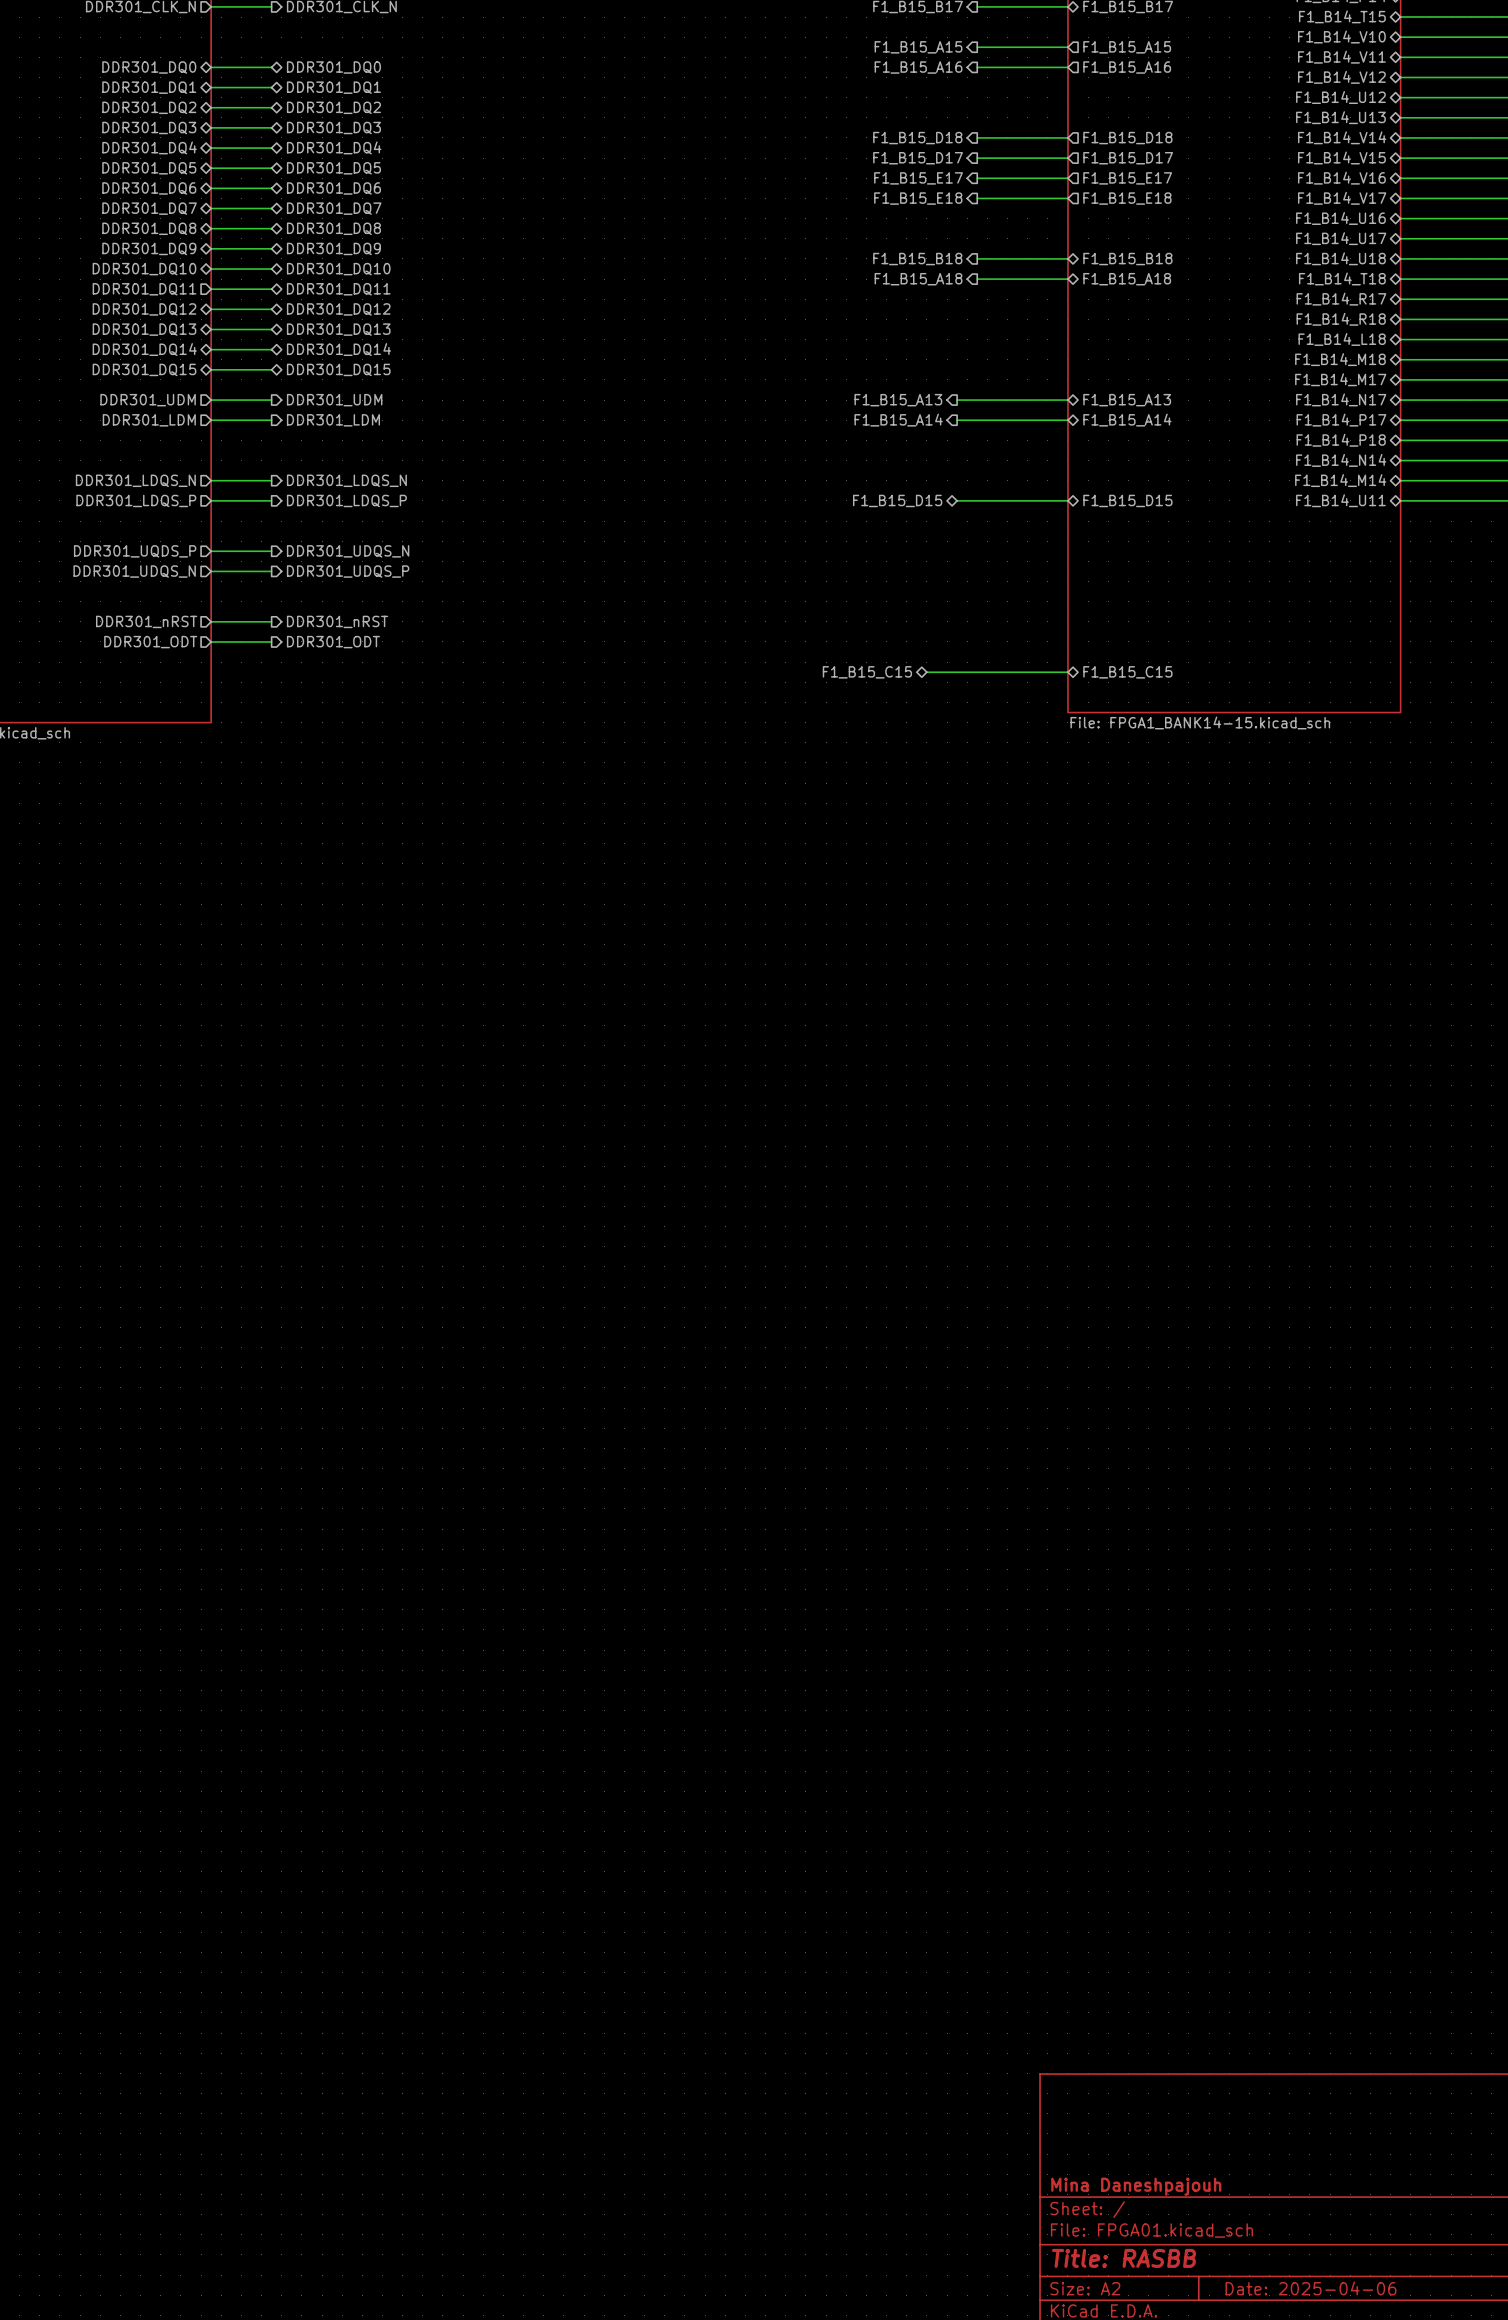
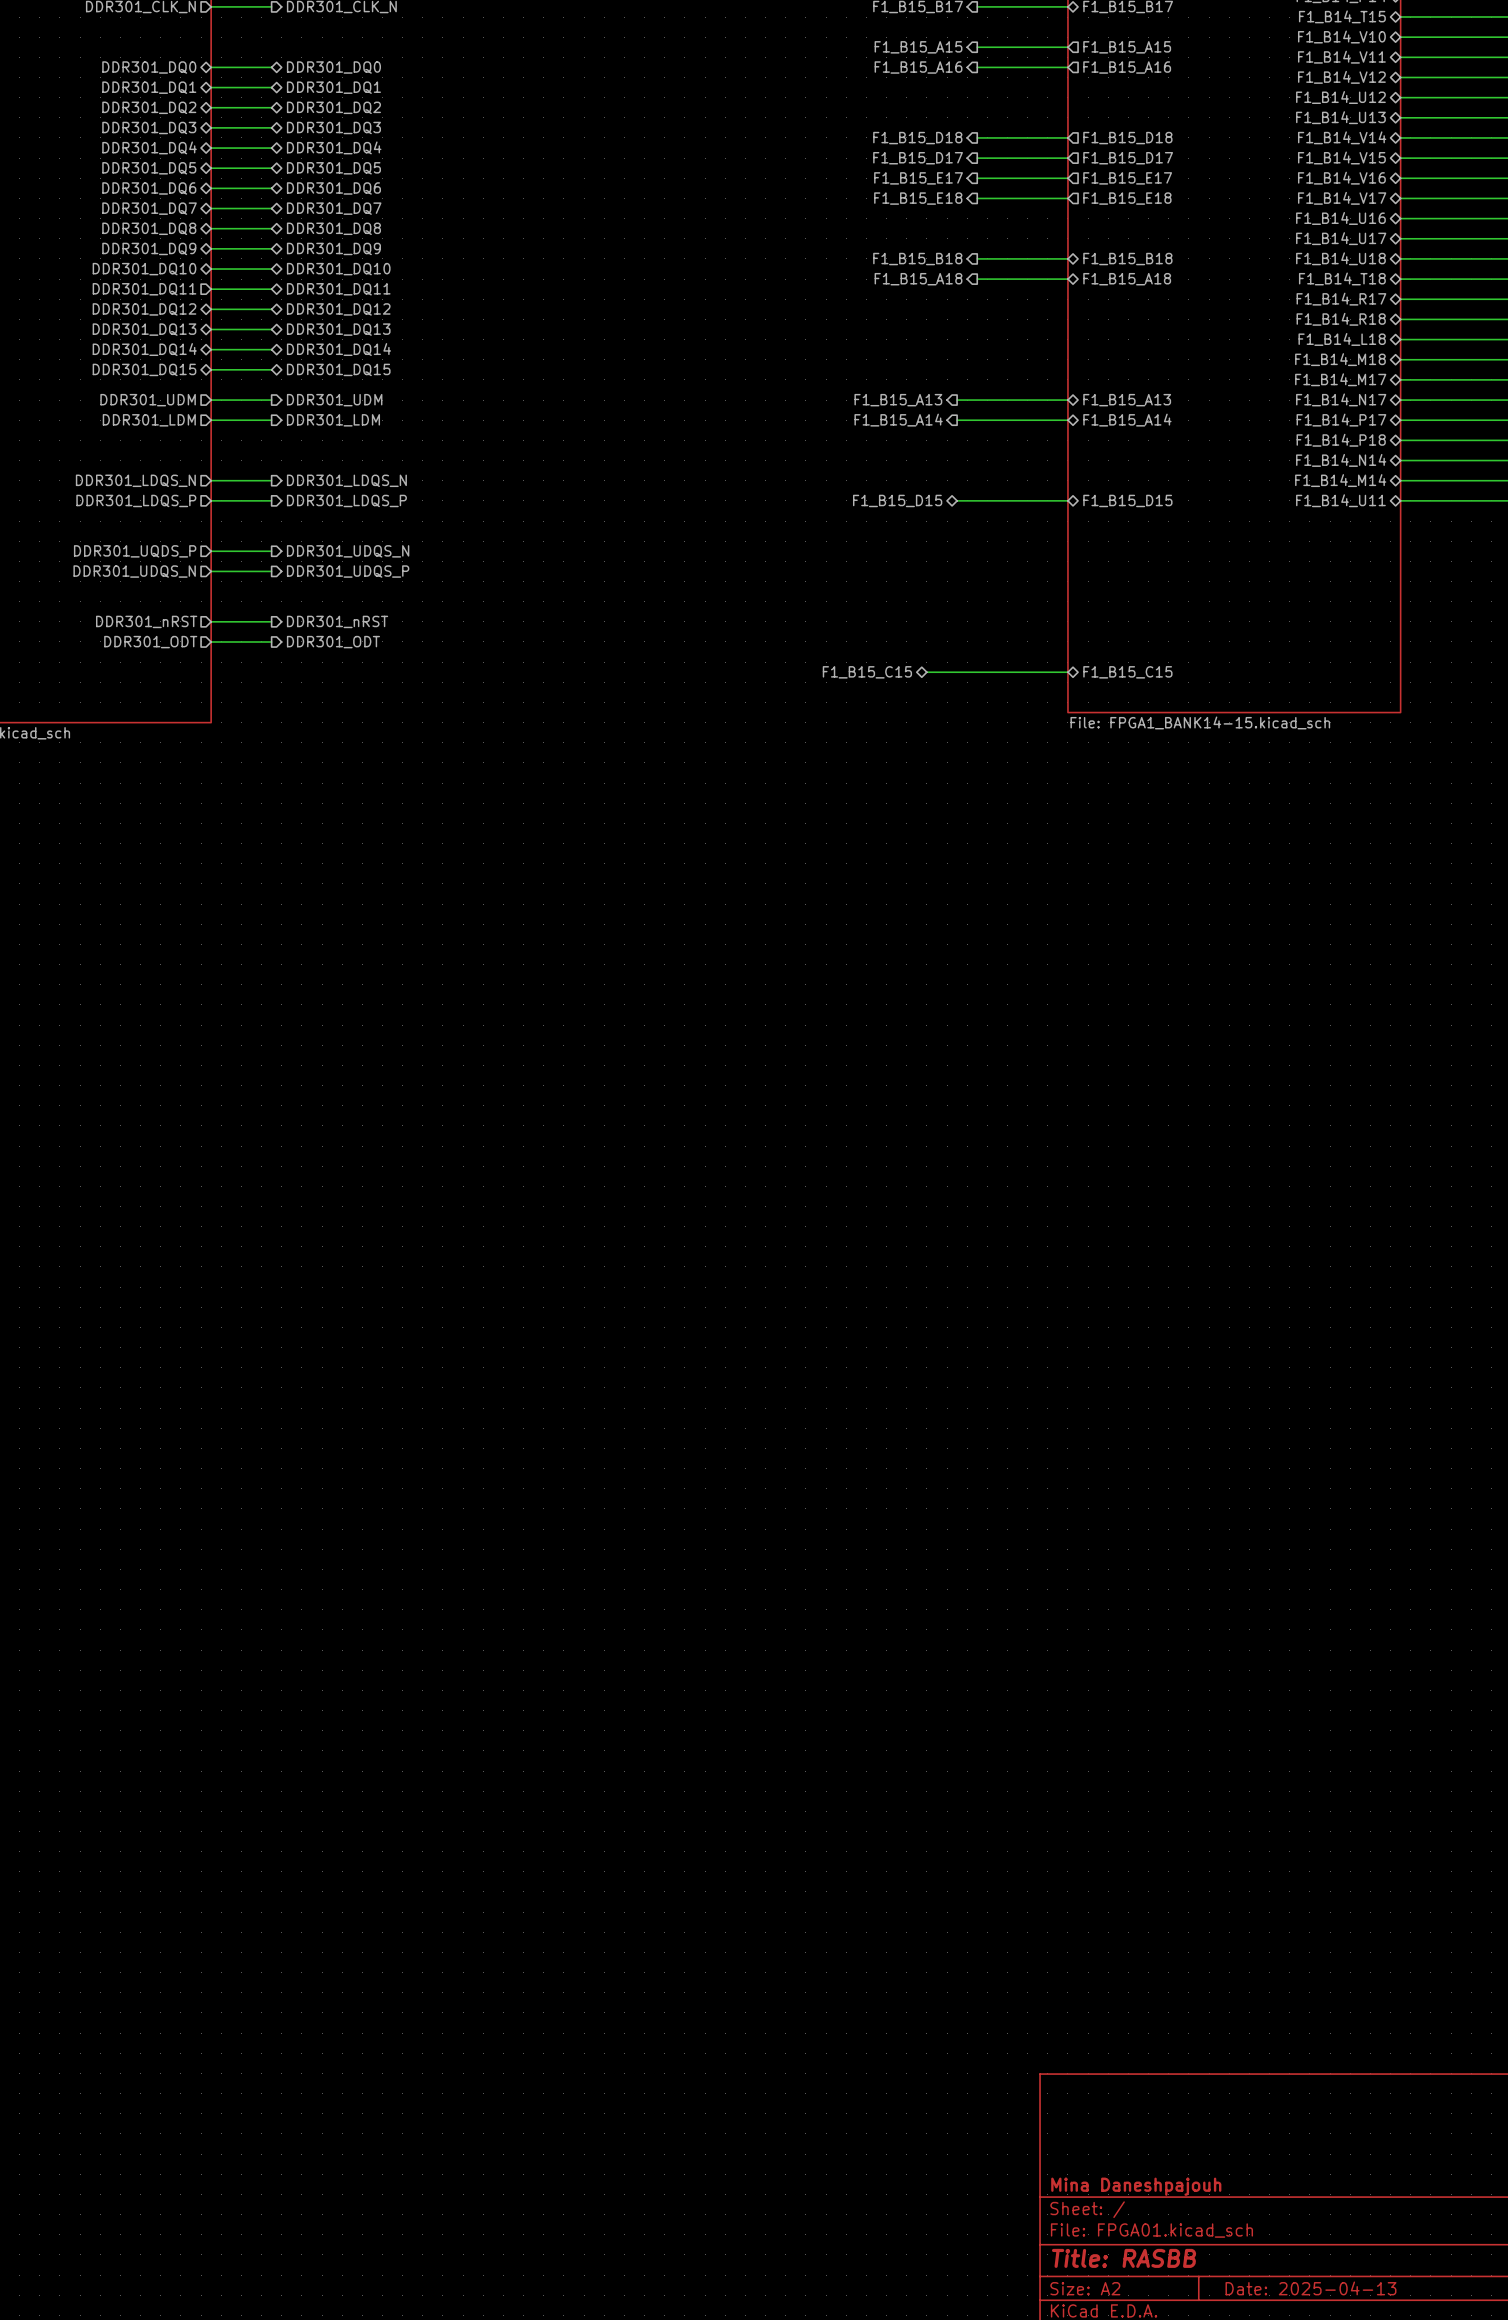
title block: Date: 2025-04-06 (1310, 2288) -> Date: 2025-04-13 (1310, 2288)

